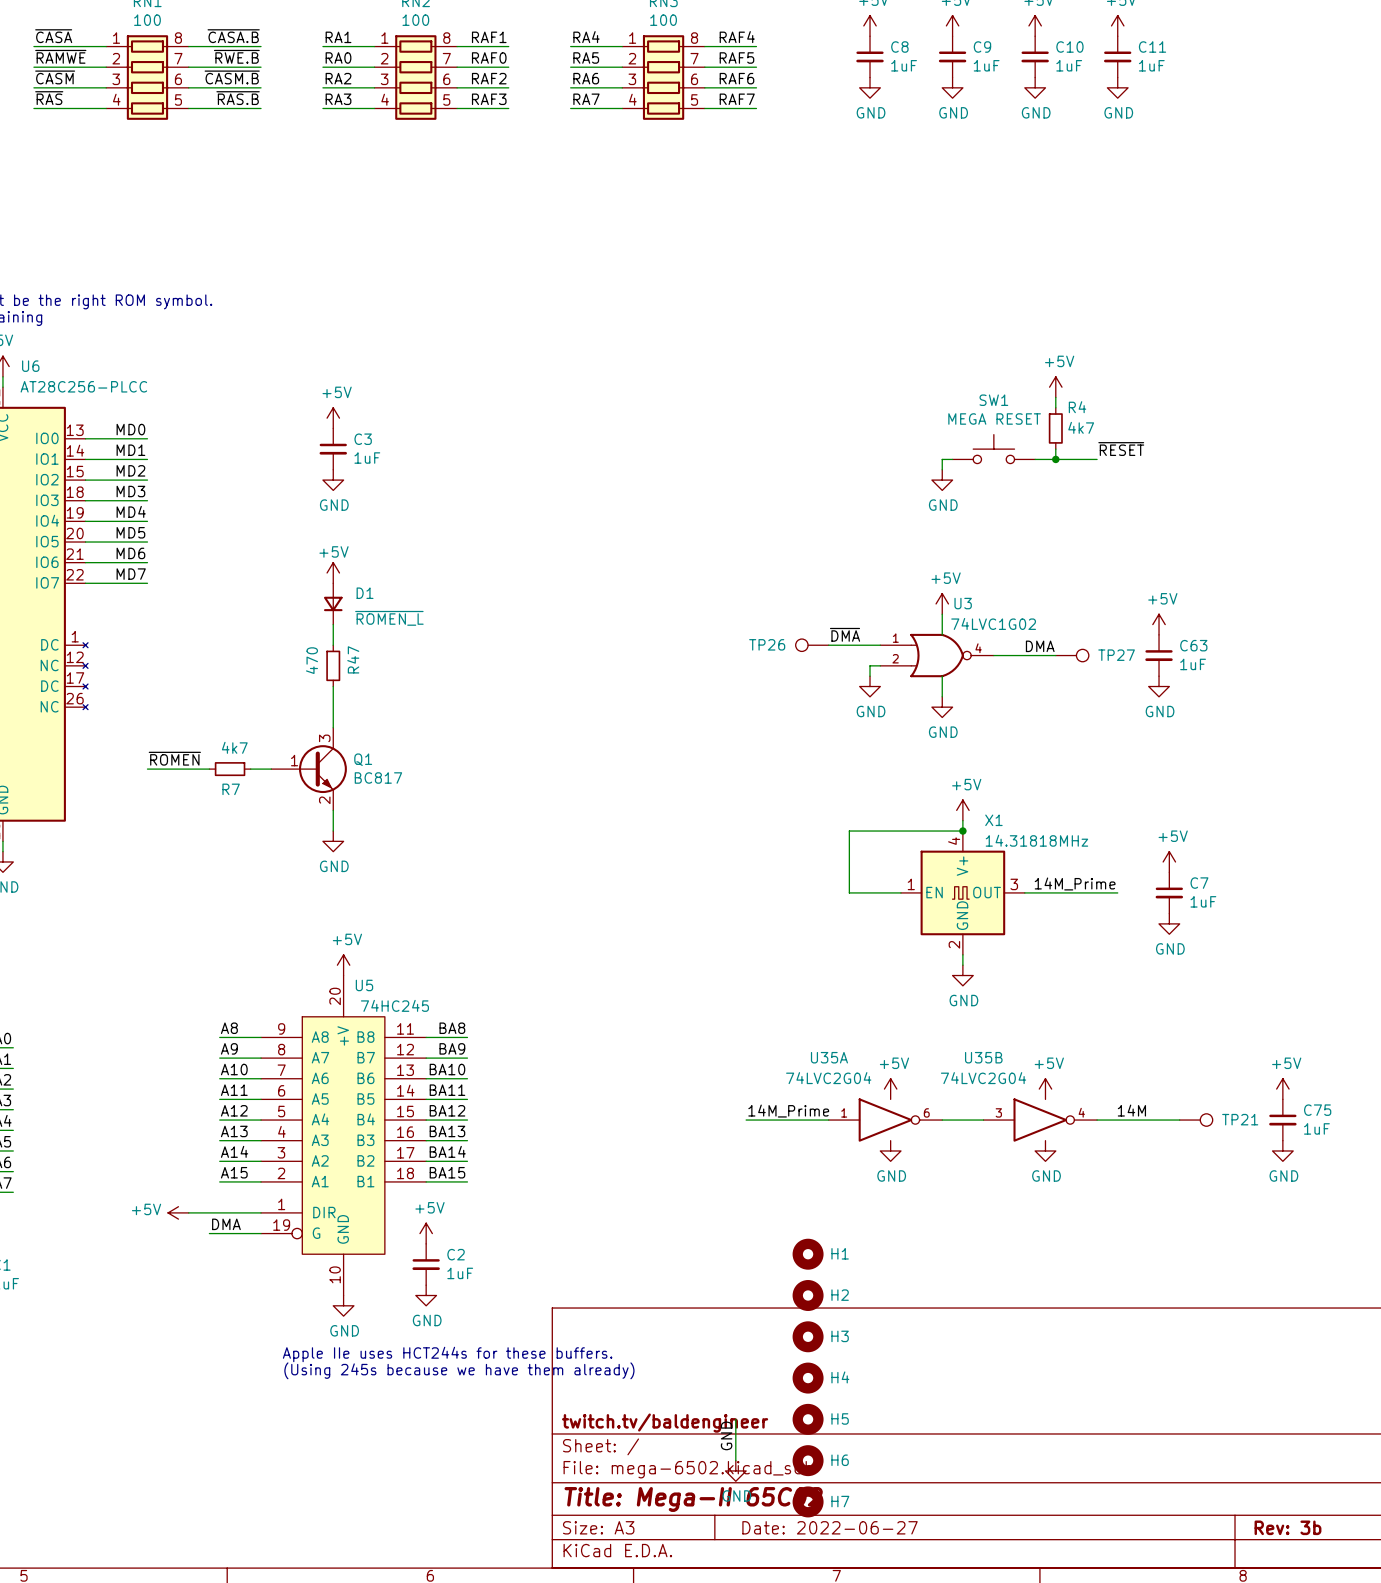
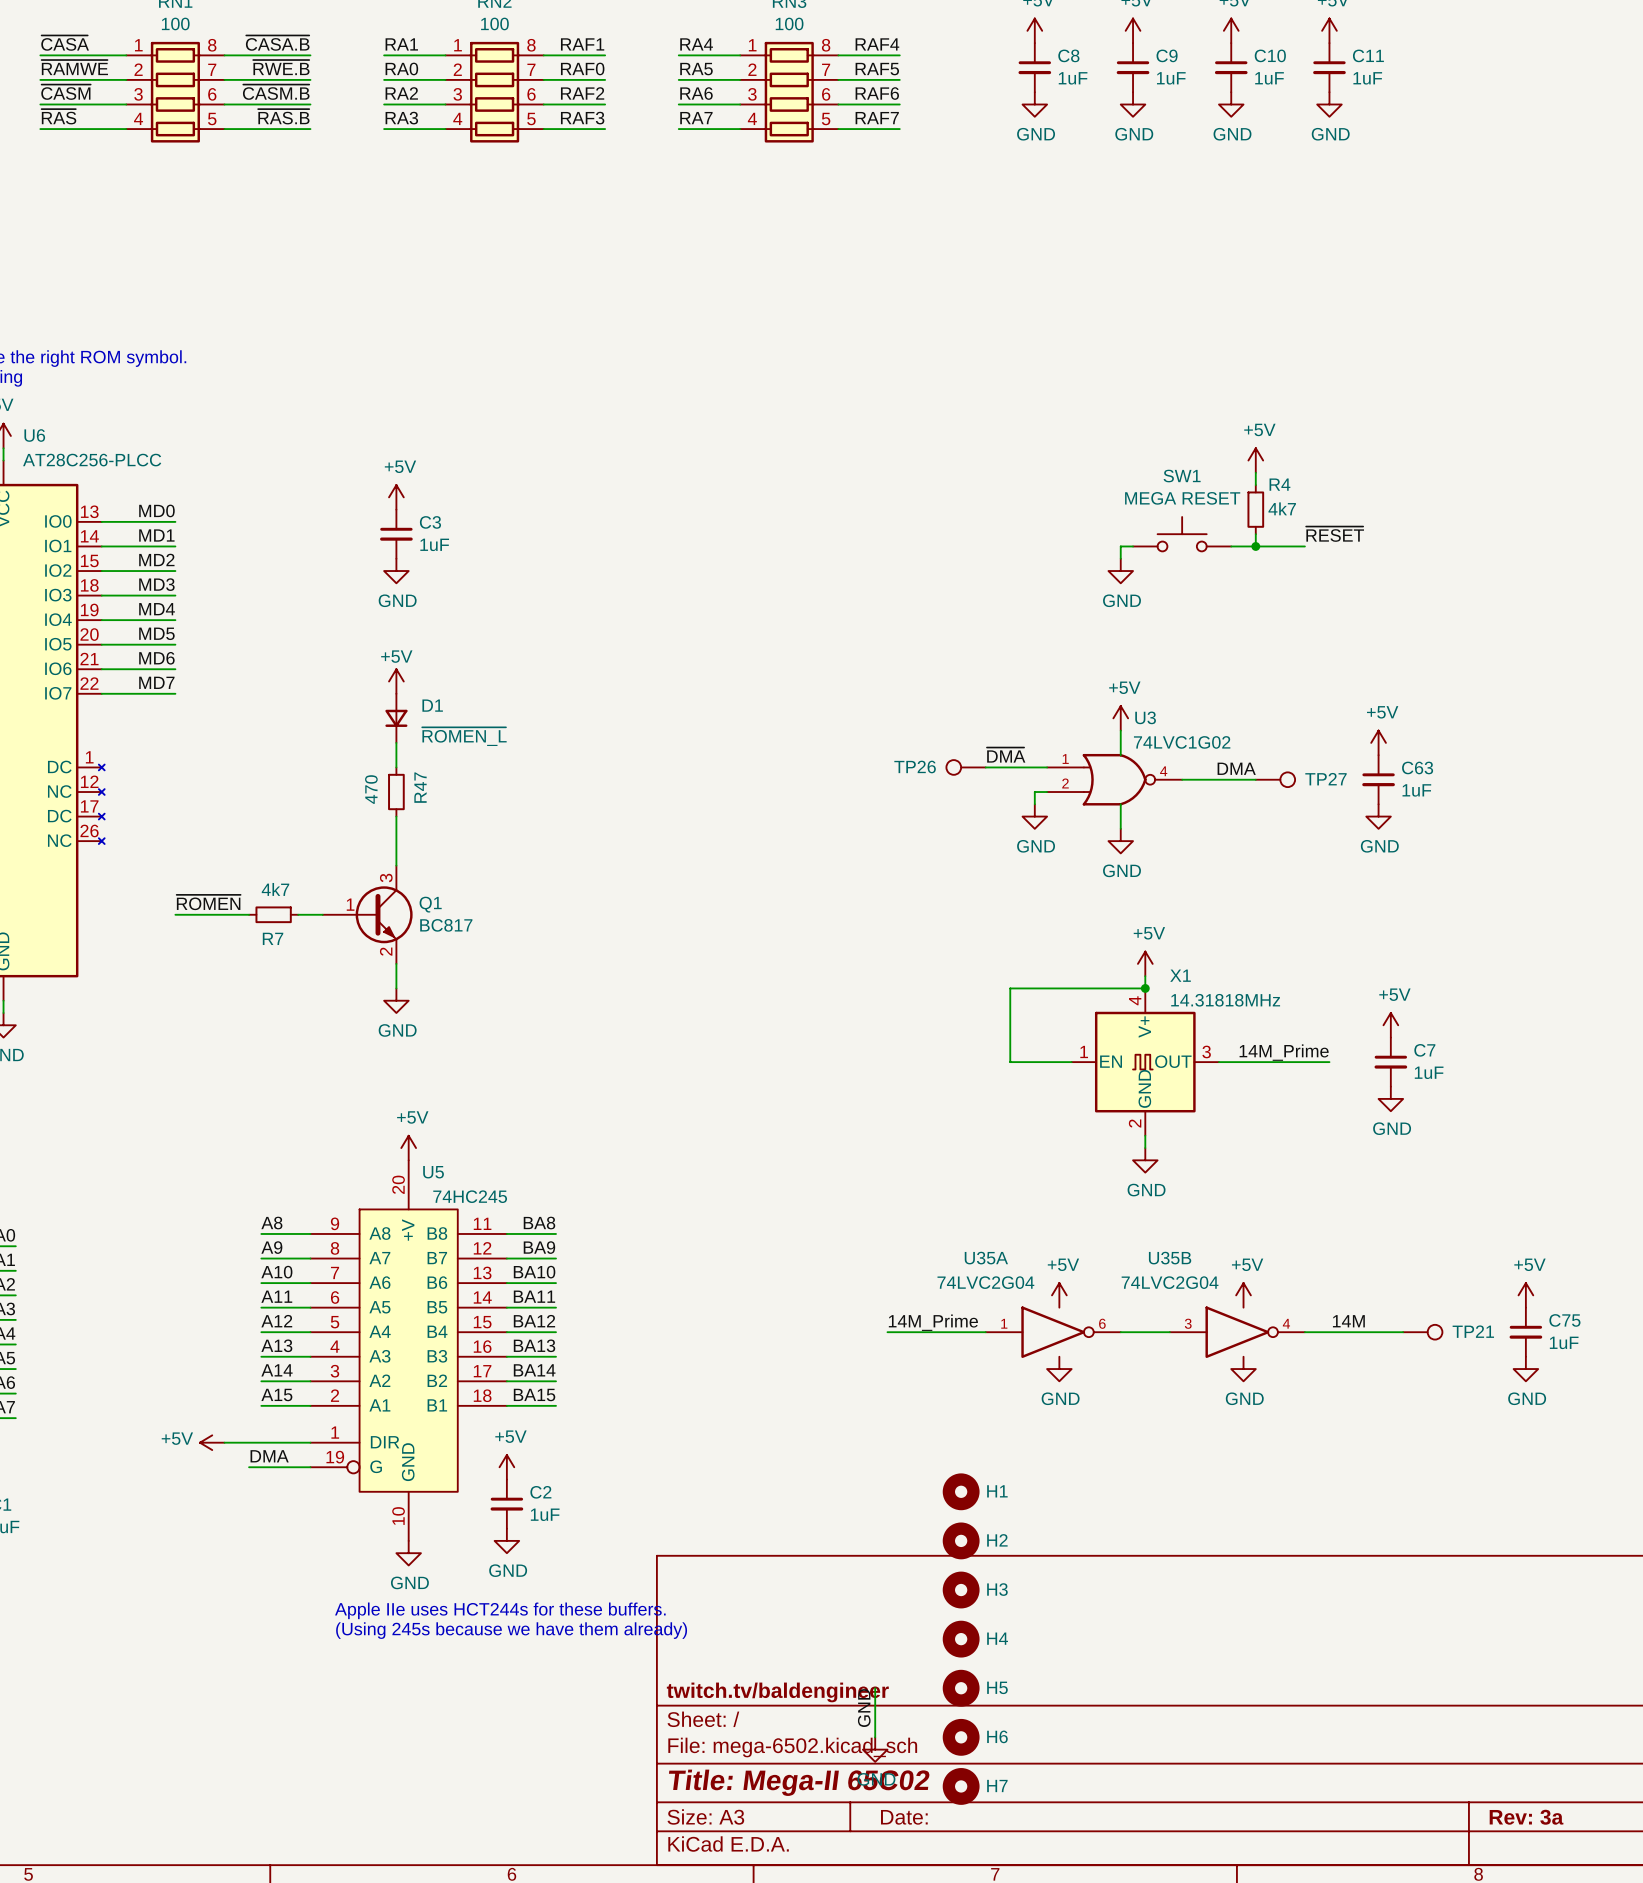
title block: Date: 2022-06-27 (830, 1527) -> Date: (904, 1817)
title block: Rev: 3b (1287, 1527) -> Rev: 3a (1526, 1817)

